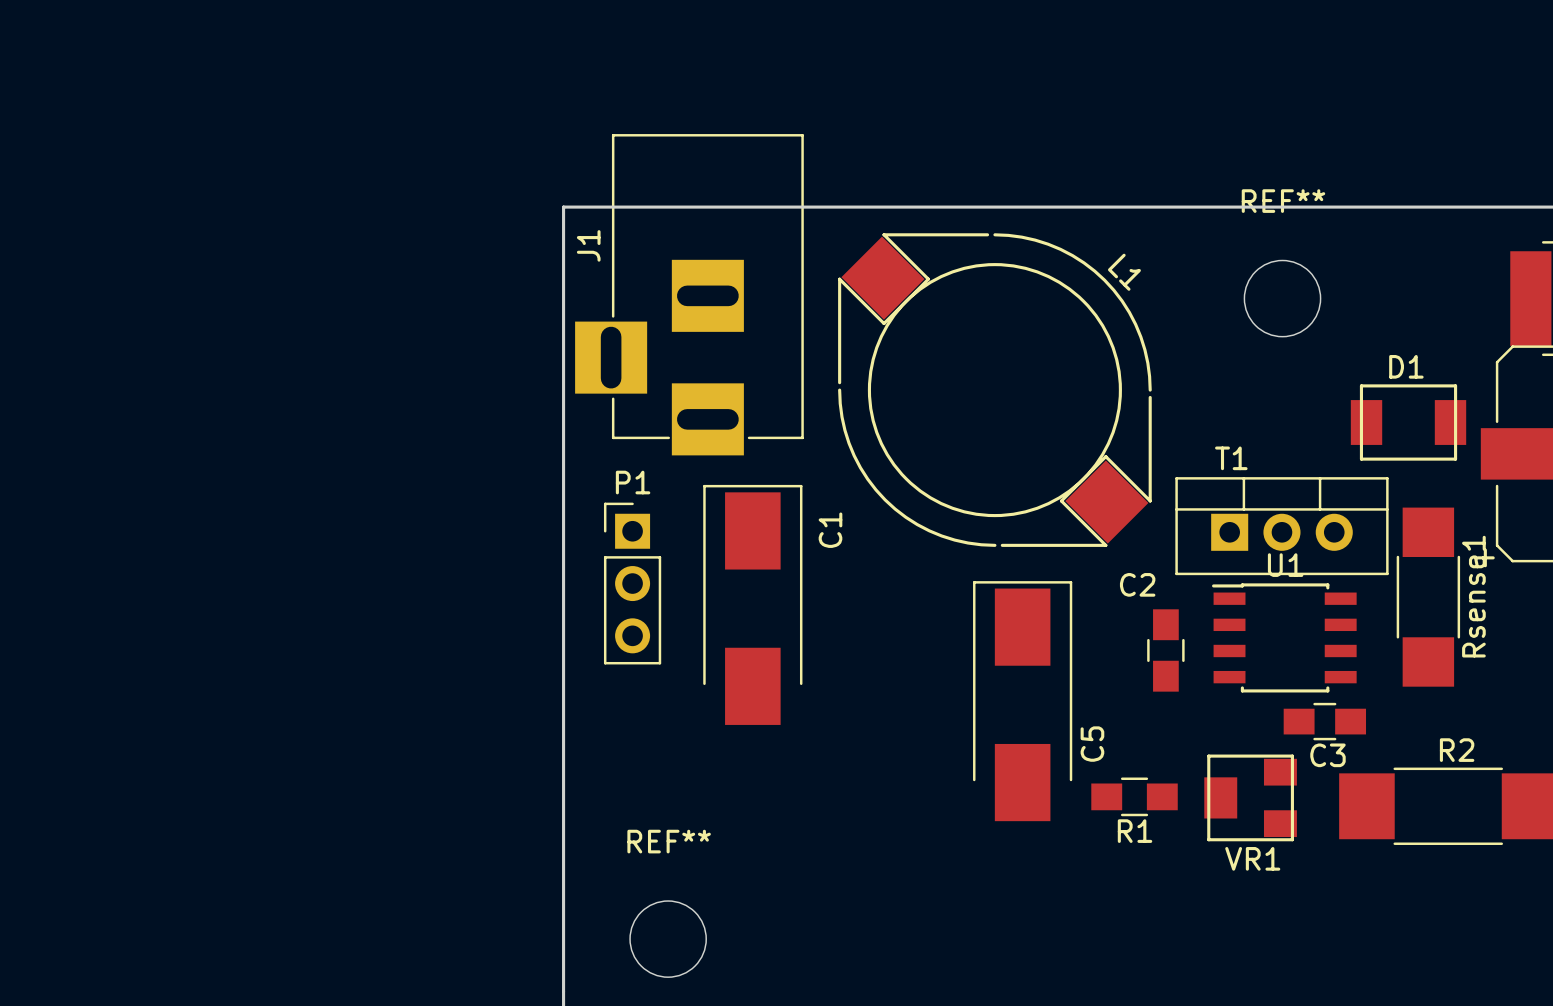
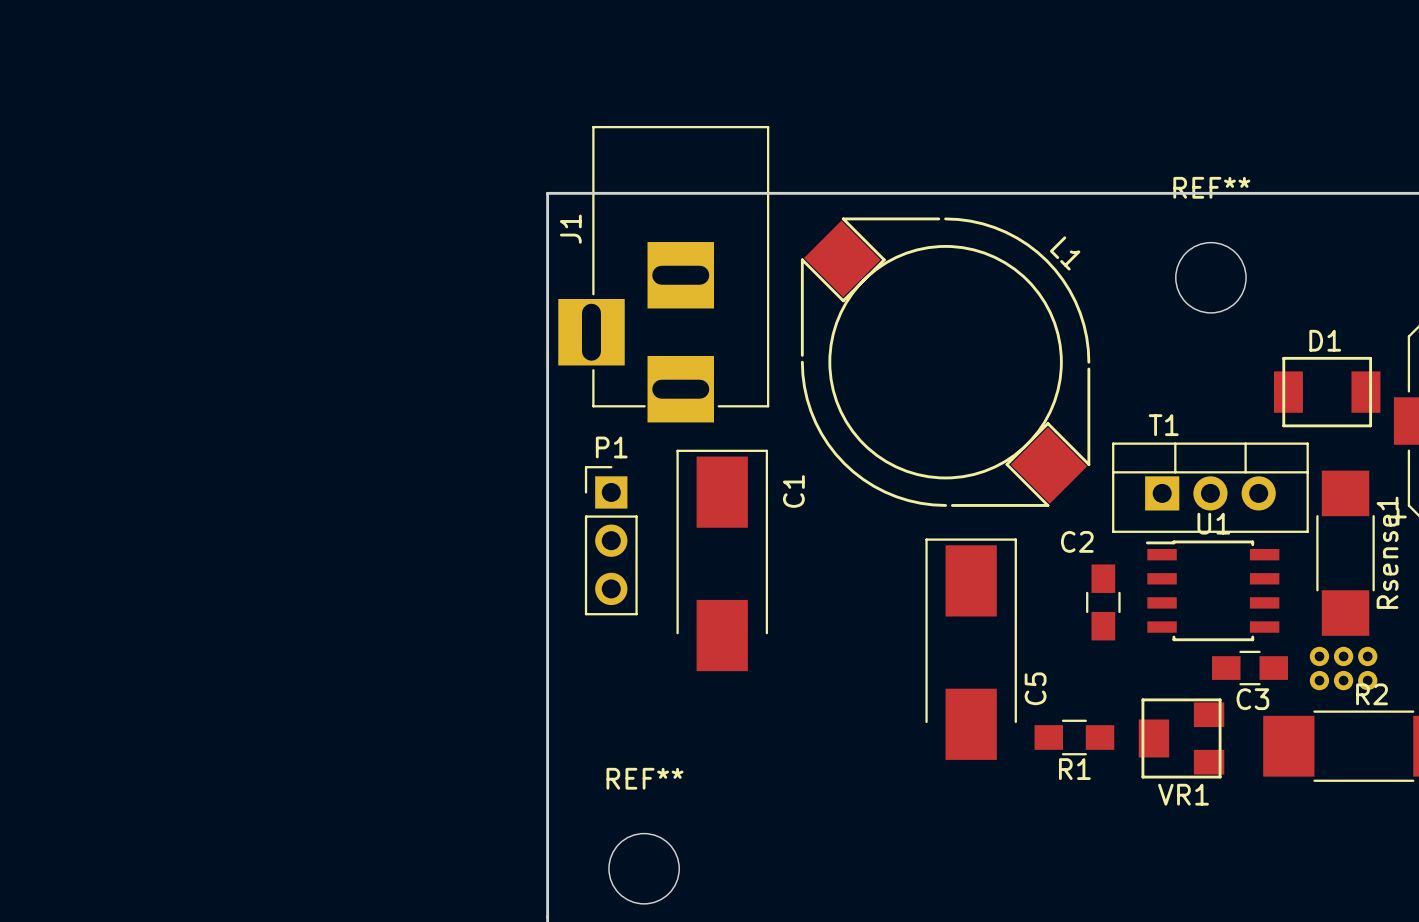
part: none -> (1319, 656)
part: none -> (1343, 656)
part: none -> (1367, 656)
part: none -> (1319, 680)
part: none -> (1343, 680)
part: none -> (1367, 680)

